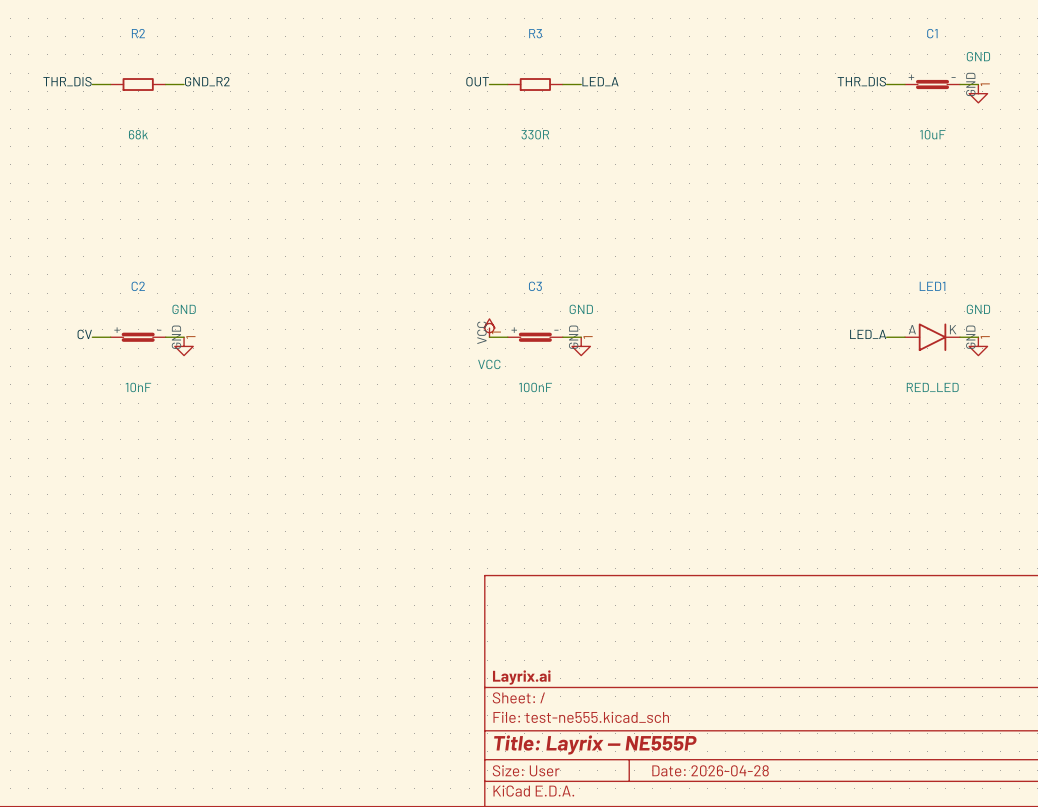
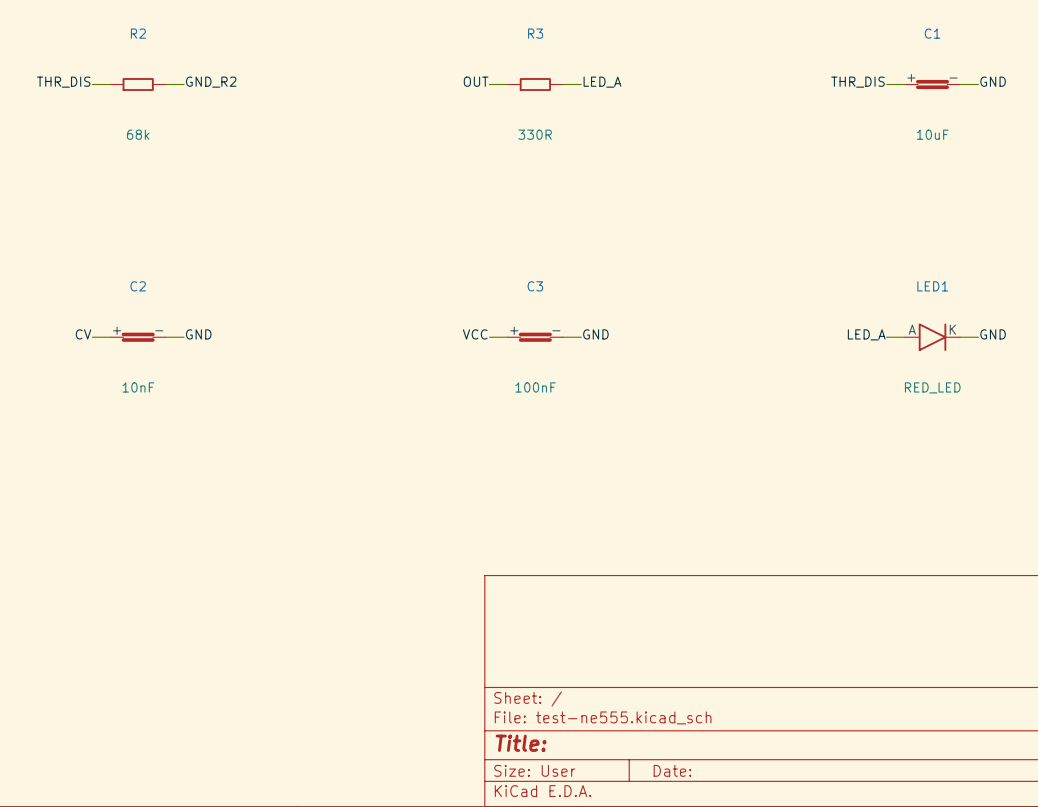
label: none -> GND (993, 81)
power symbol: GND (978, 93) -> none
power symbol: VCC (489, 328) -> none
label: none -> GND (198, 334)
label: none -> VCC (475, 334)
label: none -> GND (595, 334)
label: none -> GND (993, 334)
power symbol: GND (184, 346) -> none
power symbol: GND (581, 346) -> none
power symbol: GND (978, 346) -> none
title block: Layrix.ai (521, 677) -> none
title block: Title: Layrix — NE555P (595, 745) -> Title: (521, 743)
title block: Date: 2026-04-28 (710, 770) -> Date: (672, 770)

